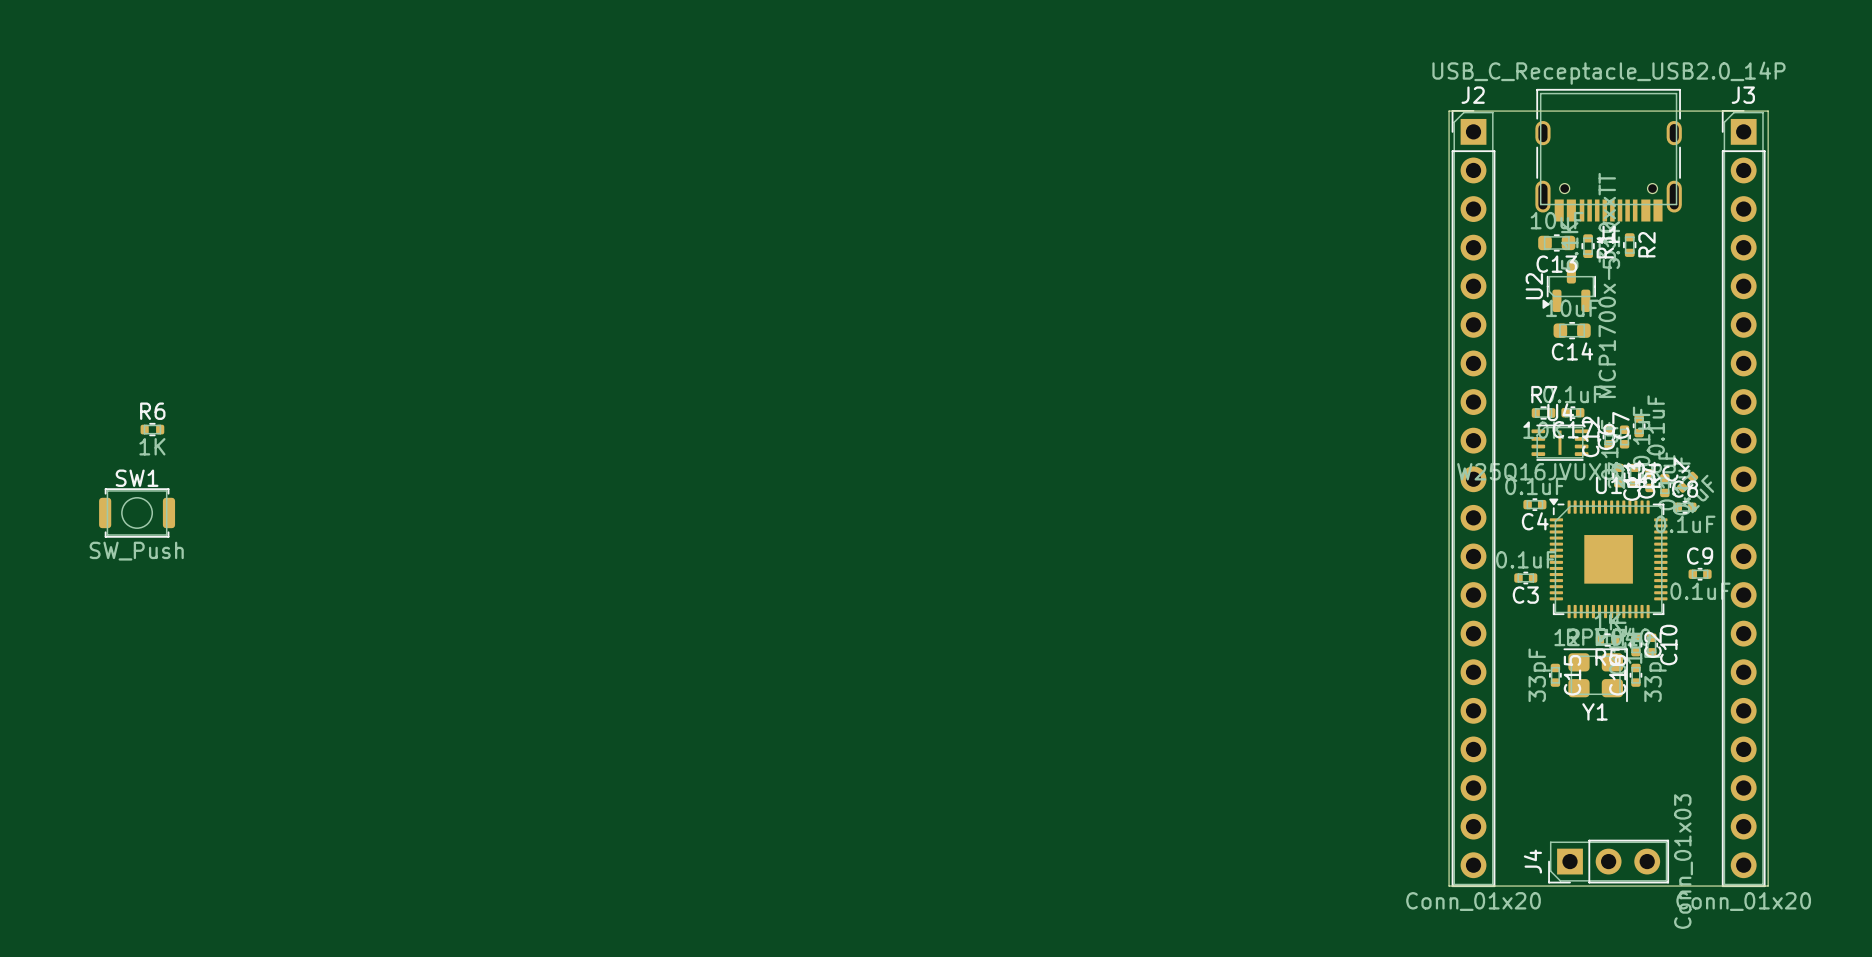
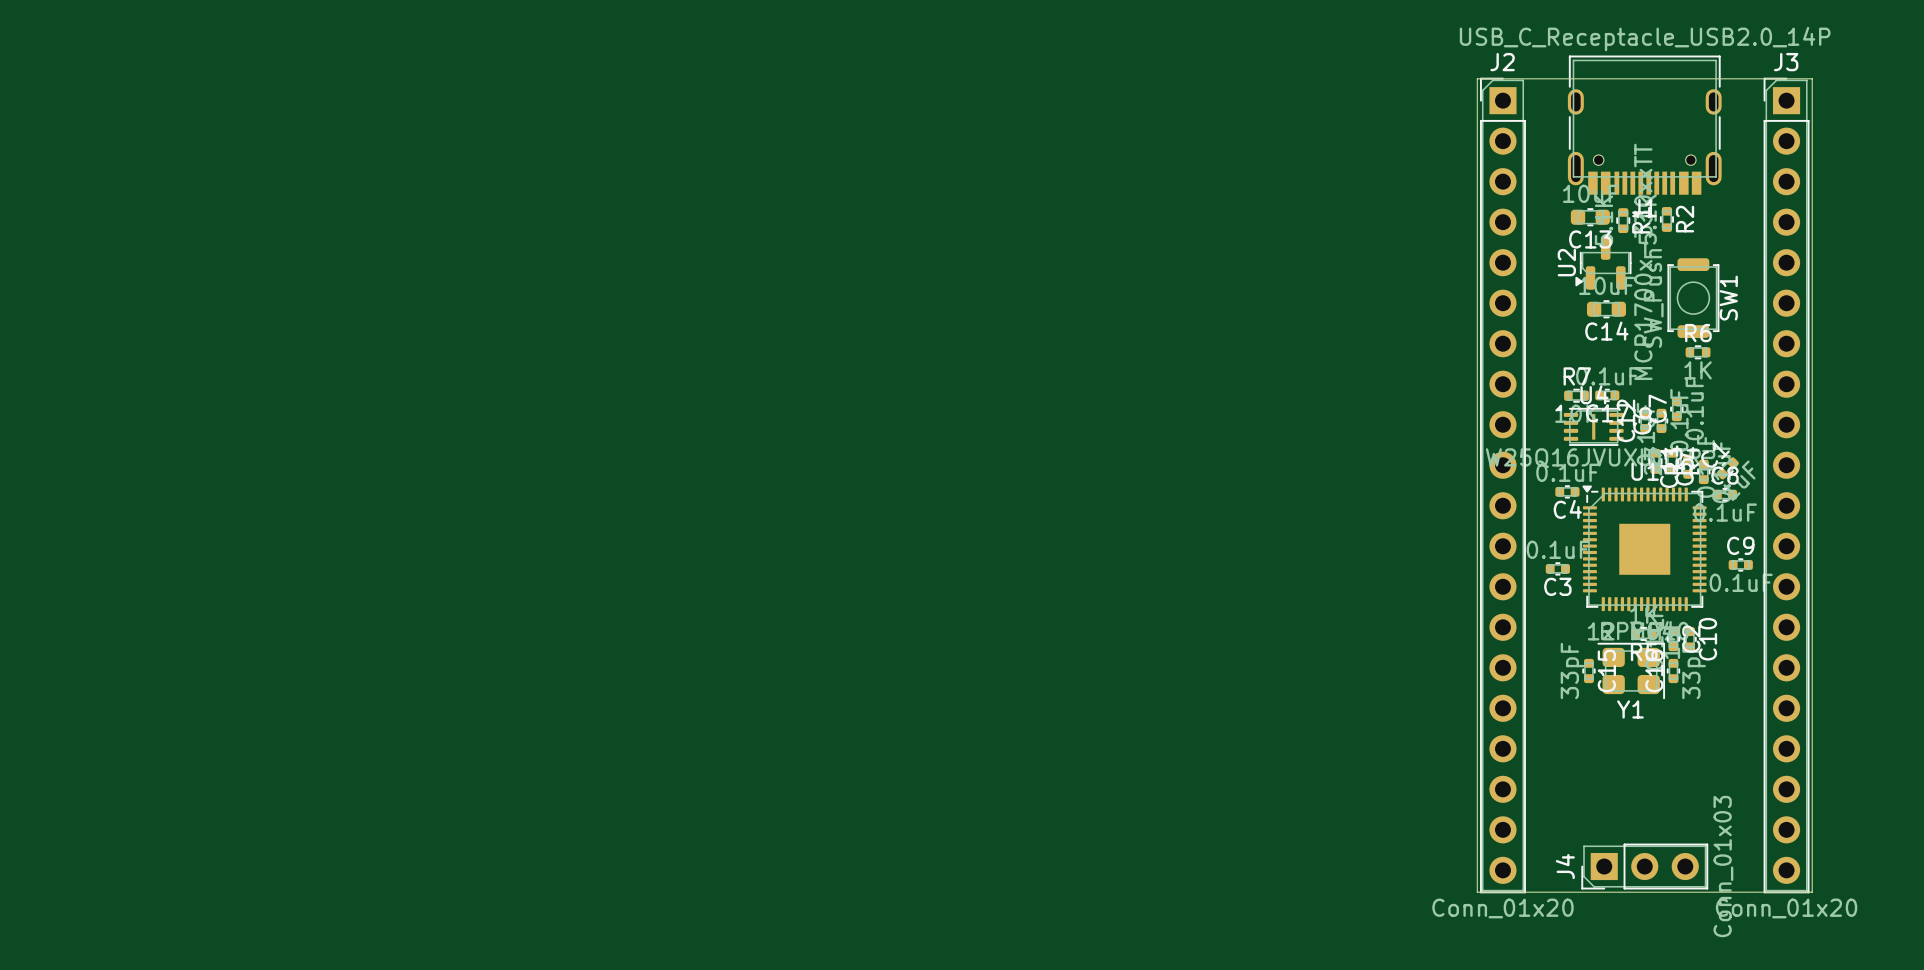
R6 position: (152, 429) -> (1698, 352)
SW1 rotation: 0° (137, 512) -> 90° clockwise (1693, 298)
SW1 position: (137, 512) -> (1693, 298)

